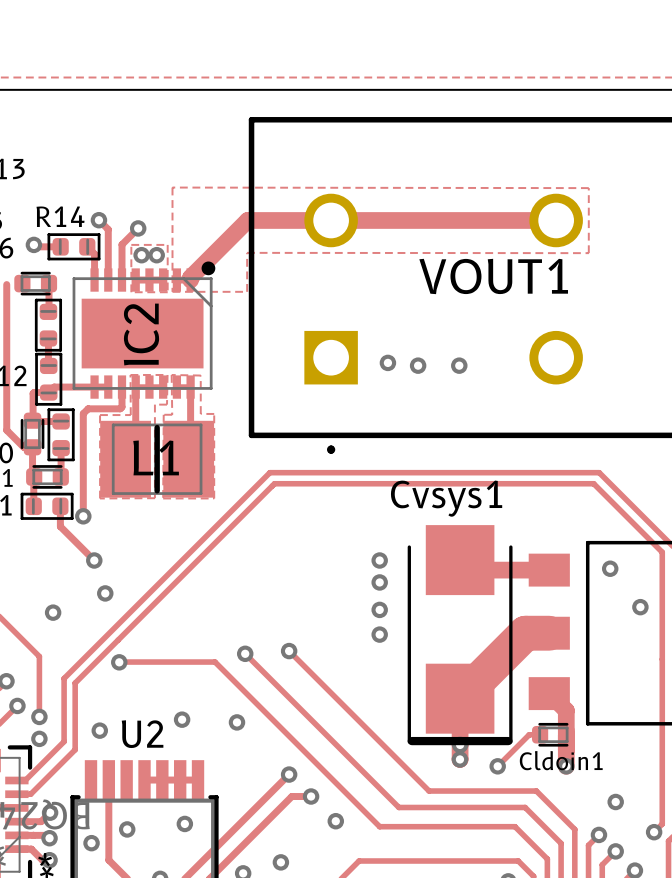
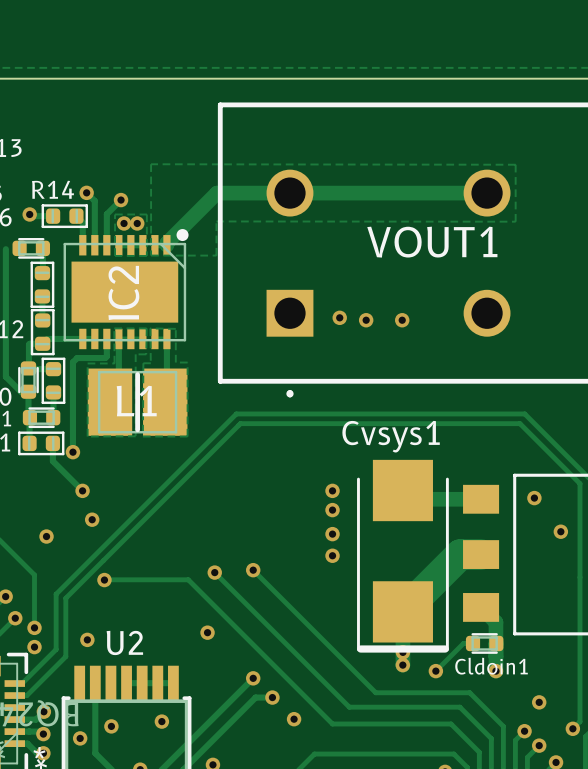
via: (182, 719) -> none
via: (280, 862) -> none

